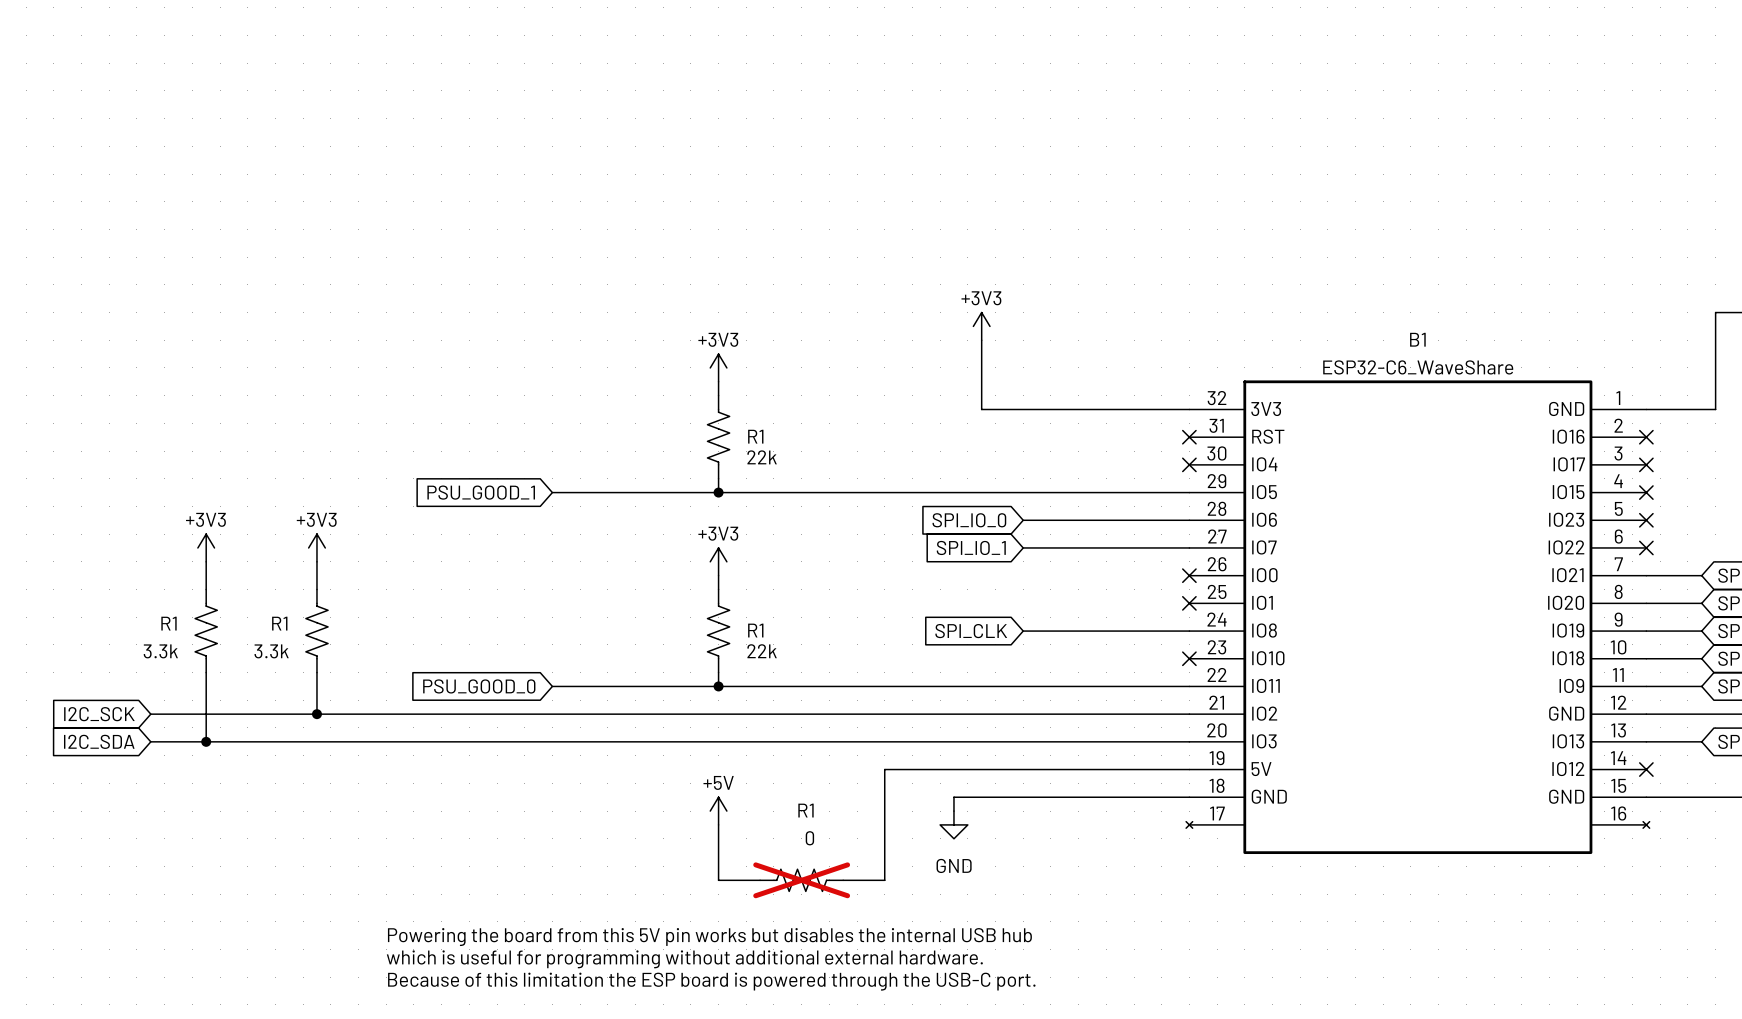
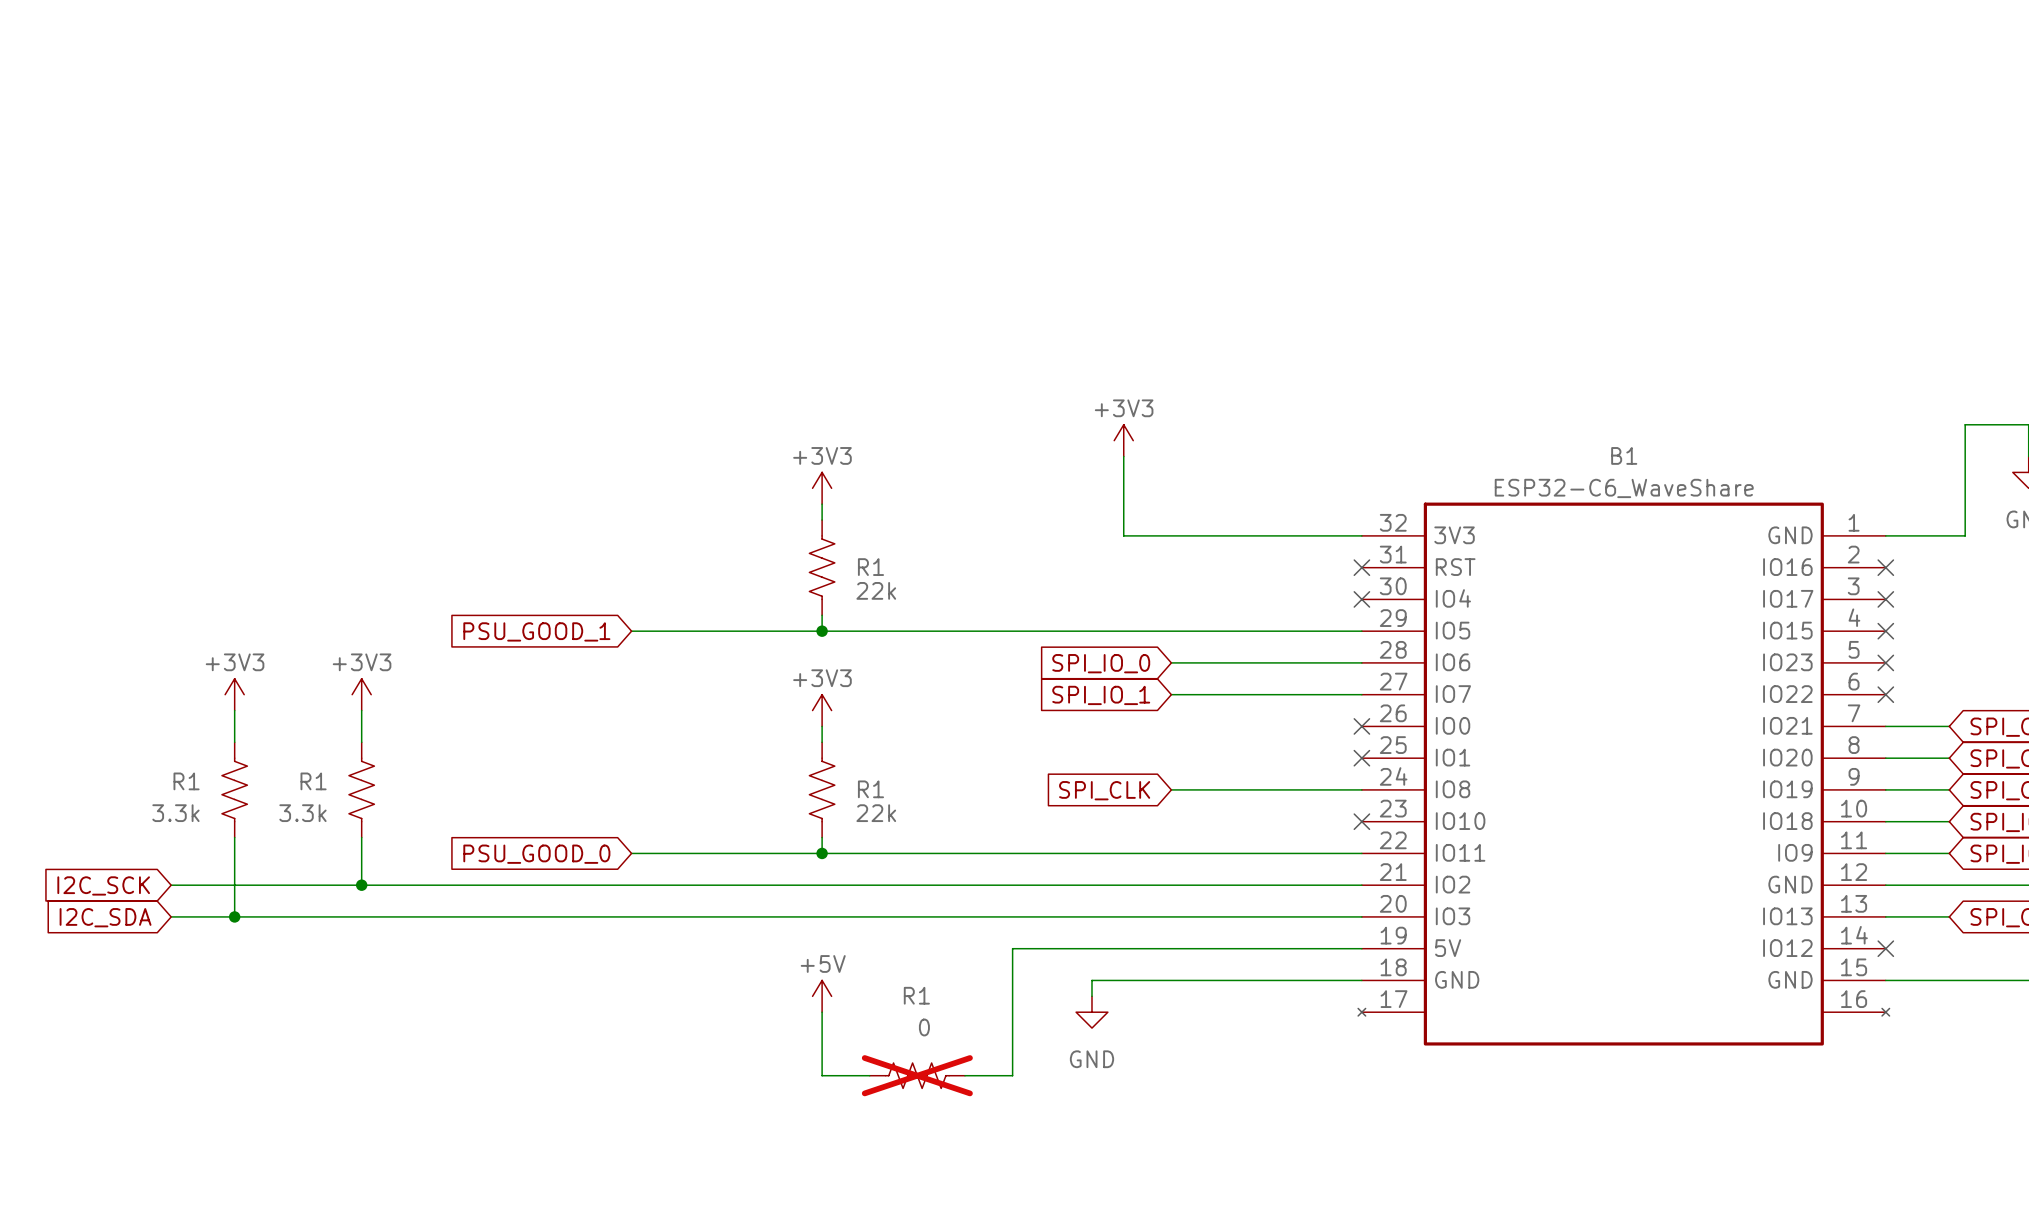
text: Powering the board from this 5V pin works but disables the internal USB hub (709, 937) -> none
text: which is useful for programming without additional external hardware. (684, 959) -> none
text: Because of this limitation the ESP board is powered through the USB-C port. (711, 981) -> none

